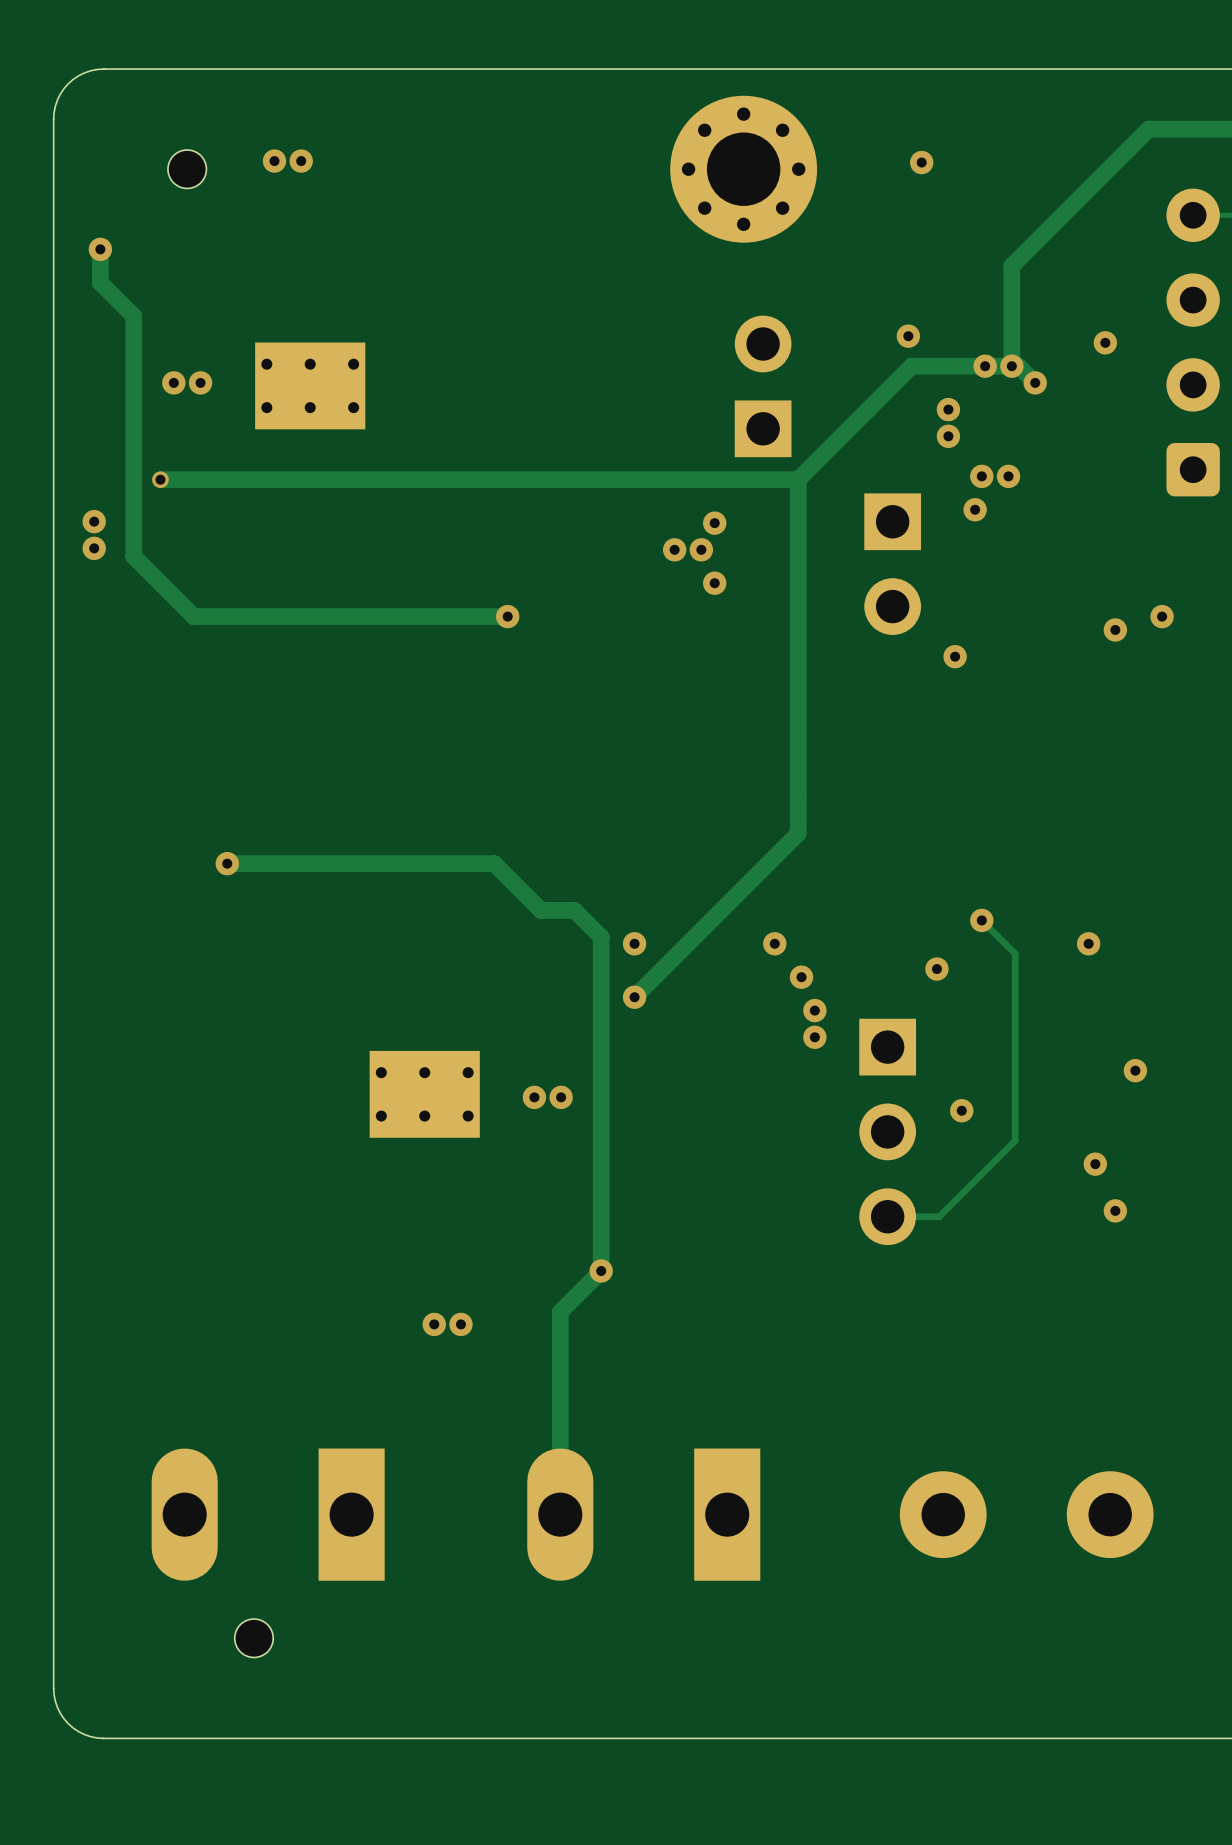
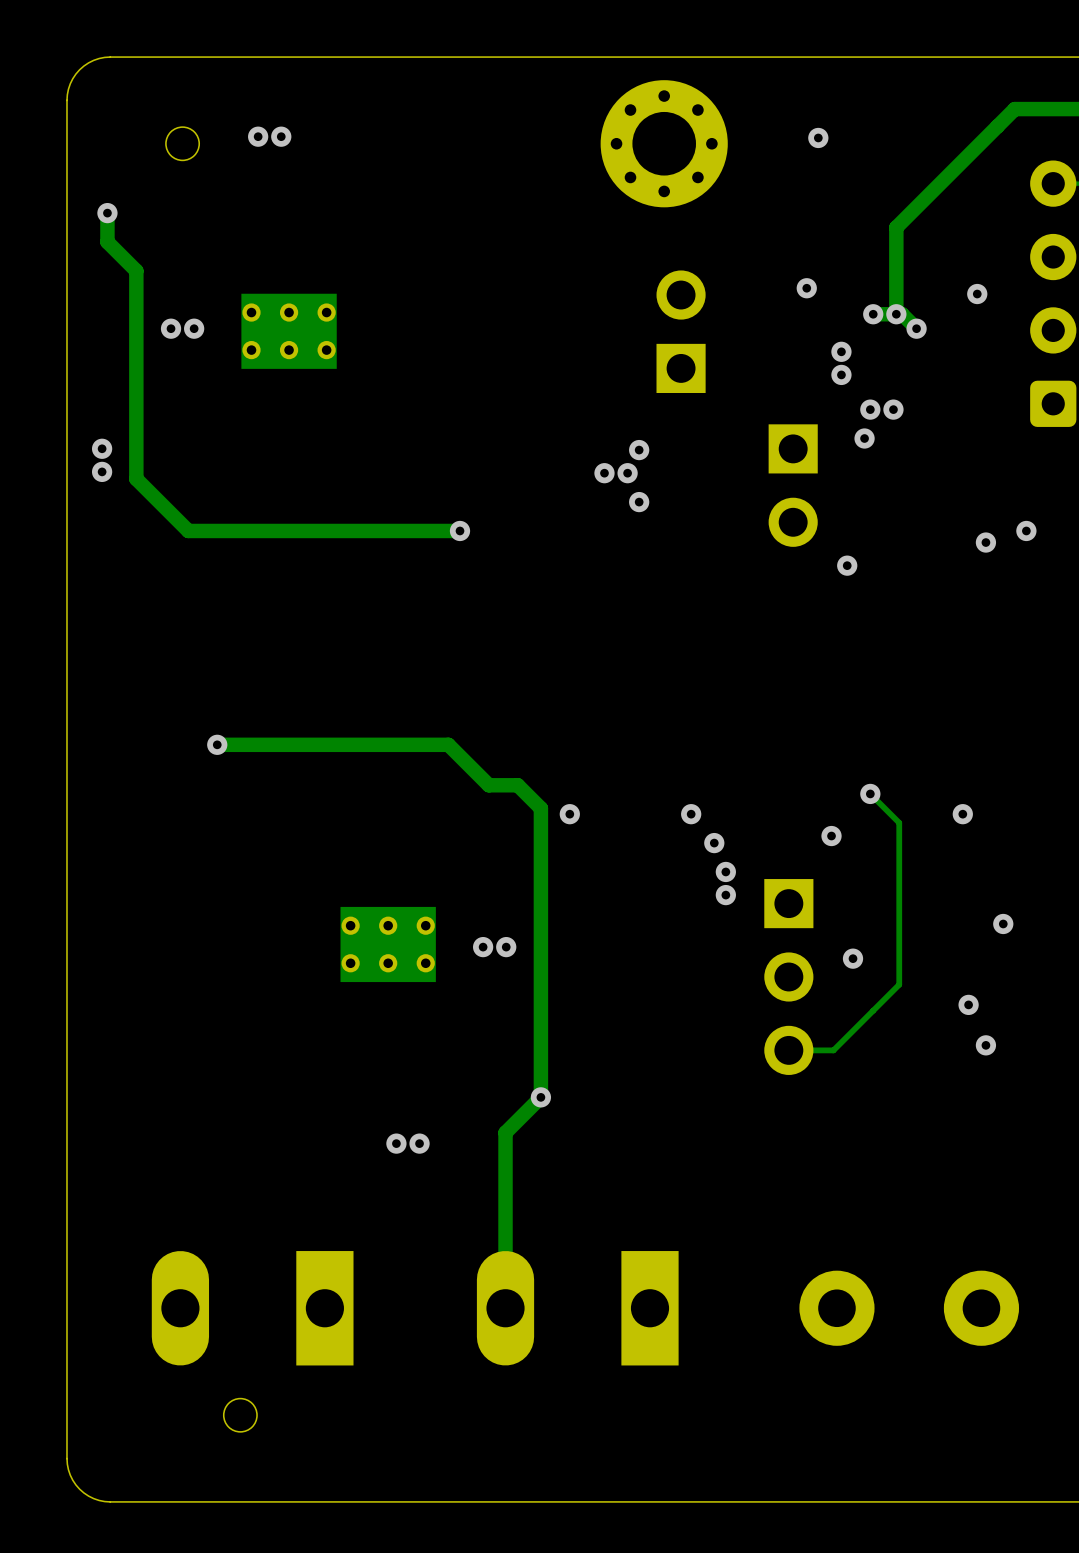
track: (985, 366) (911, 366) (798, 479) -> none
via: (160, 479) -> none
track: (798, 479) (798, 833) (634, 997) -> none
track: (798, 479) (160, 479) -> none
via: (634, 997) -> none

